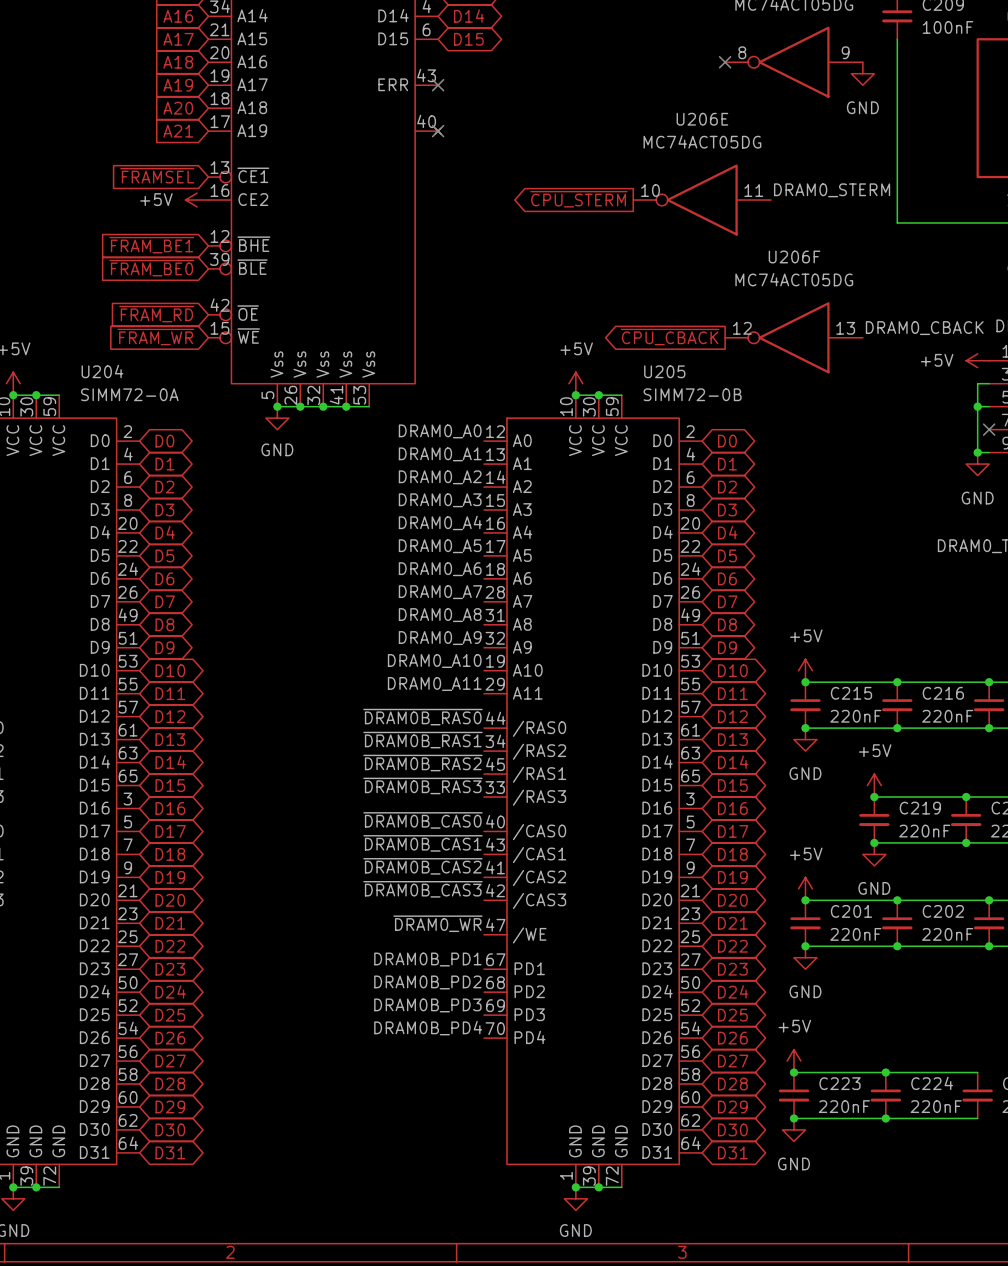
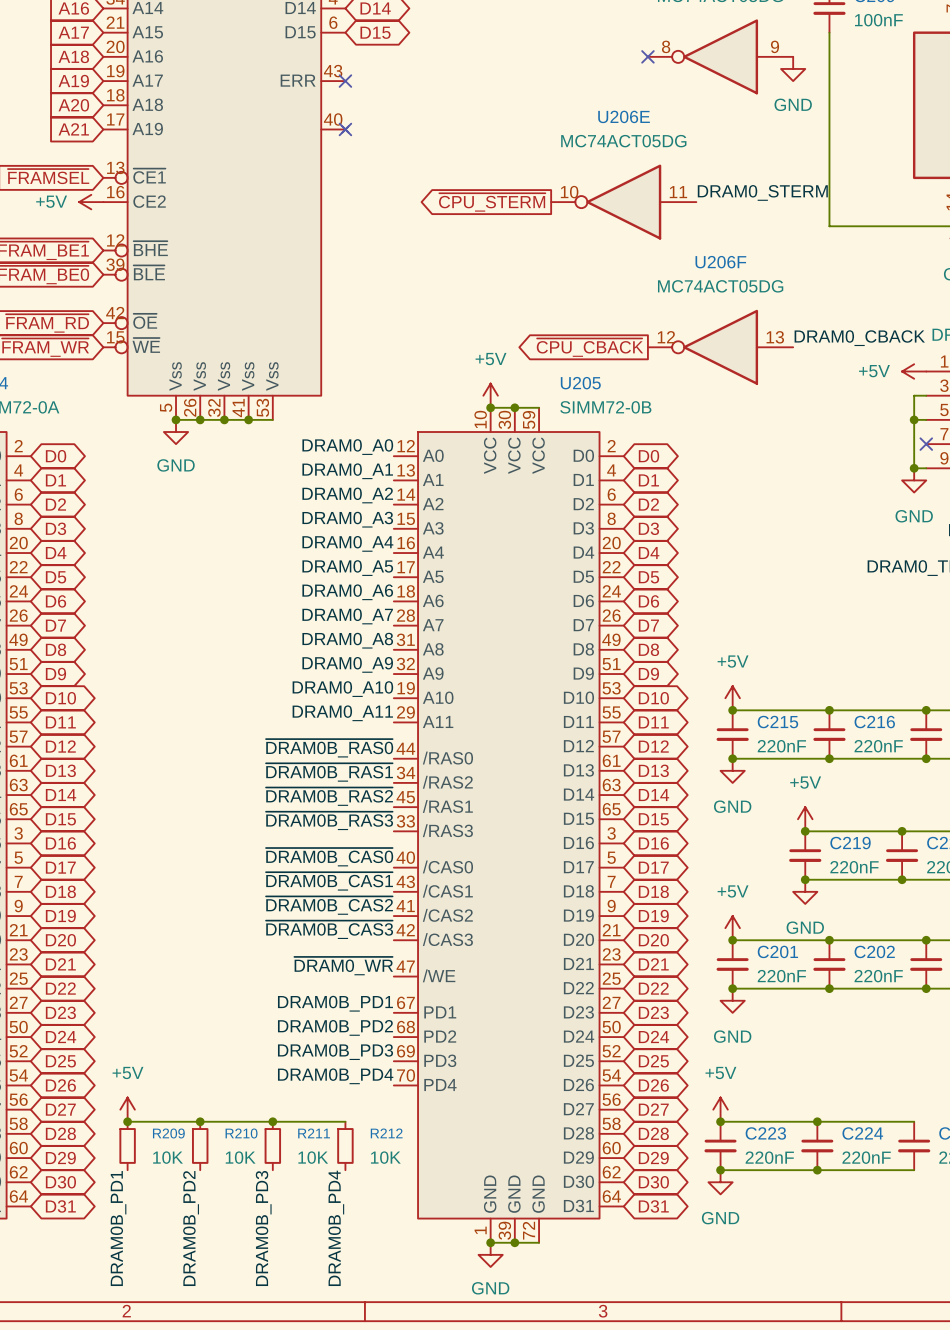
power symbol: none -> +5V (127, 1109)
wire: none -> (127, 1121) (345, 1121)
junction: none -> (127, 1121)
junction: none -> (200, 1121)
junction: none -> (272, 1121)
R209: none -> 10K (127, 1145)
R210: none -> 10K (200, 1145)
R211: none -> 10K (272, 1145)
R212: none -> 10K (345, 1145)
label: none -> DRAM0B_PD1 (118, 1228)
label: none -> DRAM0B_PD2 (191, 1228)
label: none -> DRAM0B_PD3 (263, 1228)
label: none -> DRAM0B_PD4 (336, 1228)

